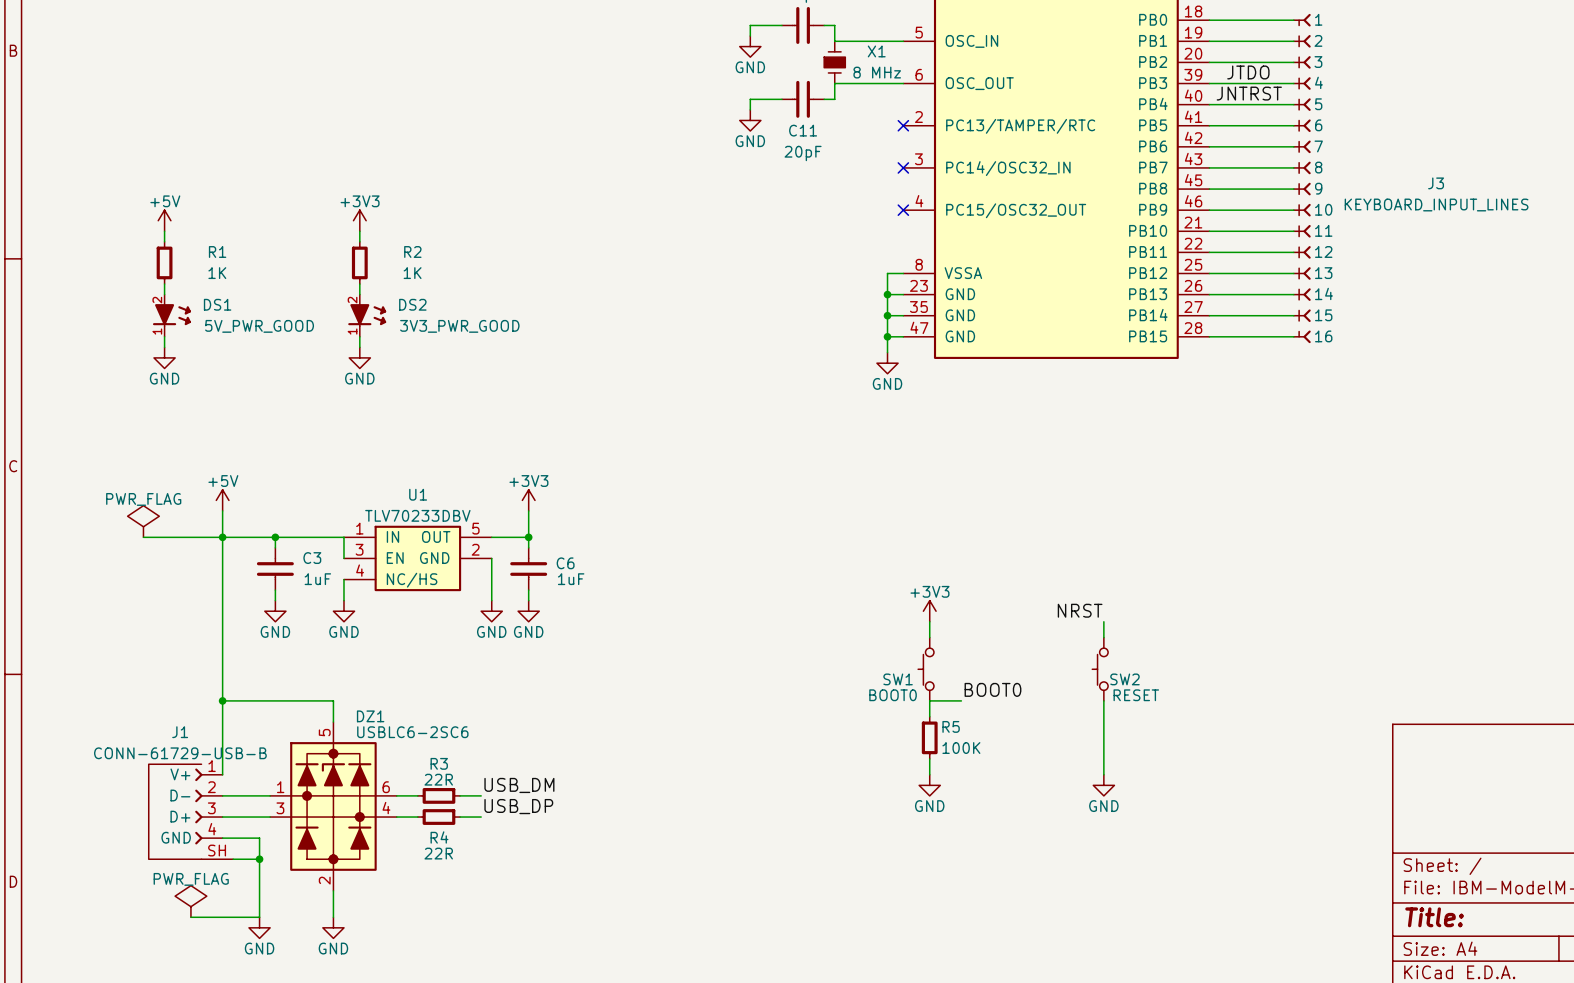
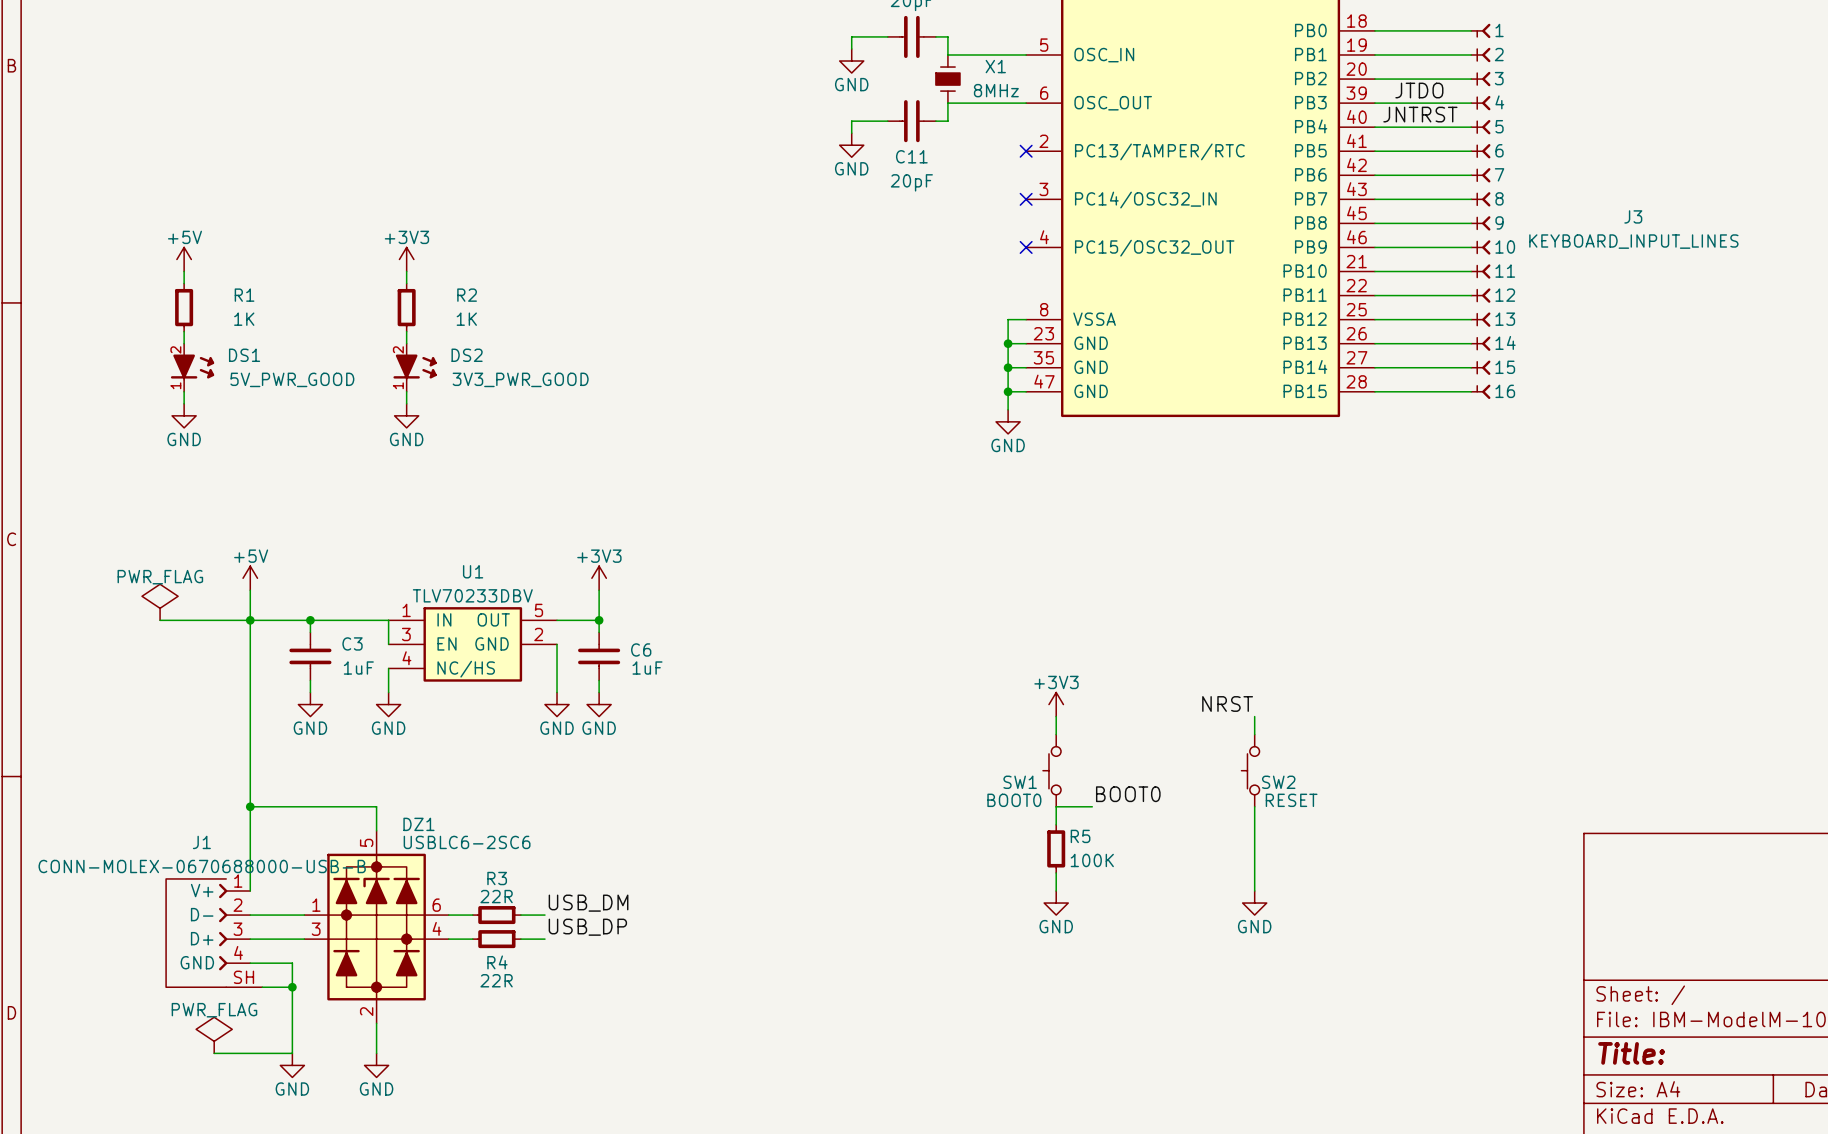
X1 value: 8 MHz (877, 72) -> 8MHz (996, 90)
J1 value: CONN-61729-USB-B (180, 753) -> CONN-MOLEX-0670688000-USB-B (202, 866)

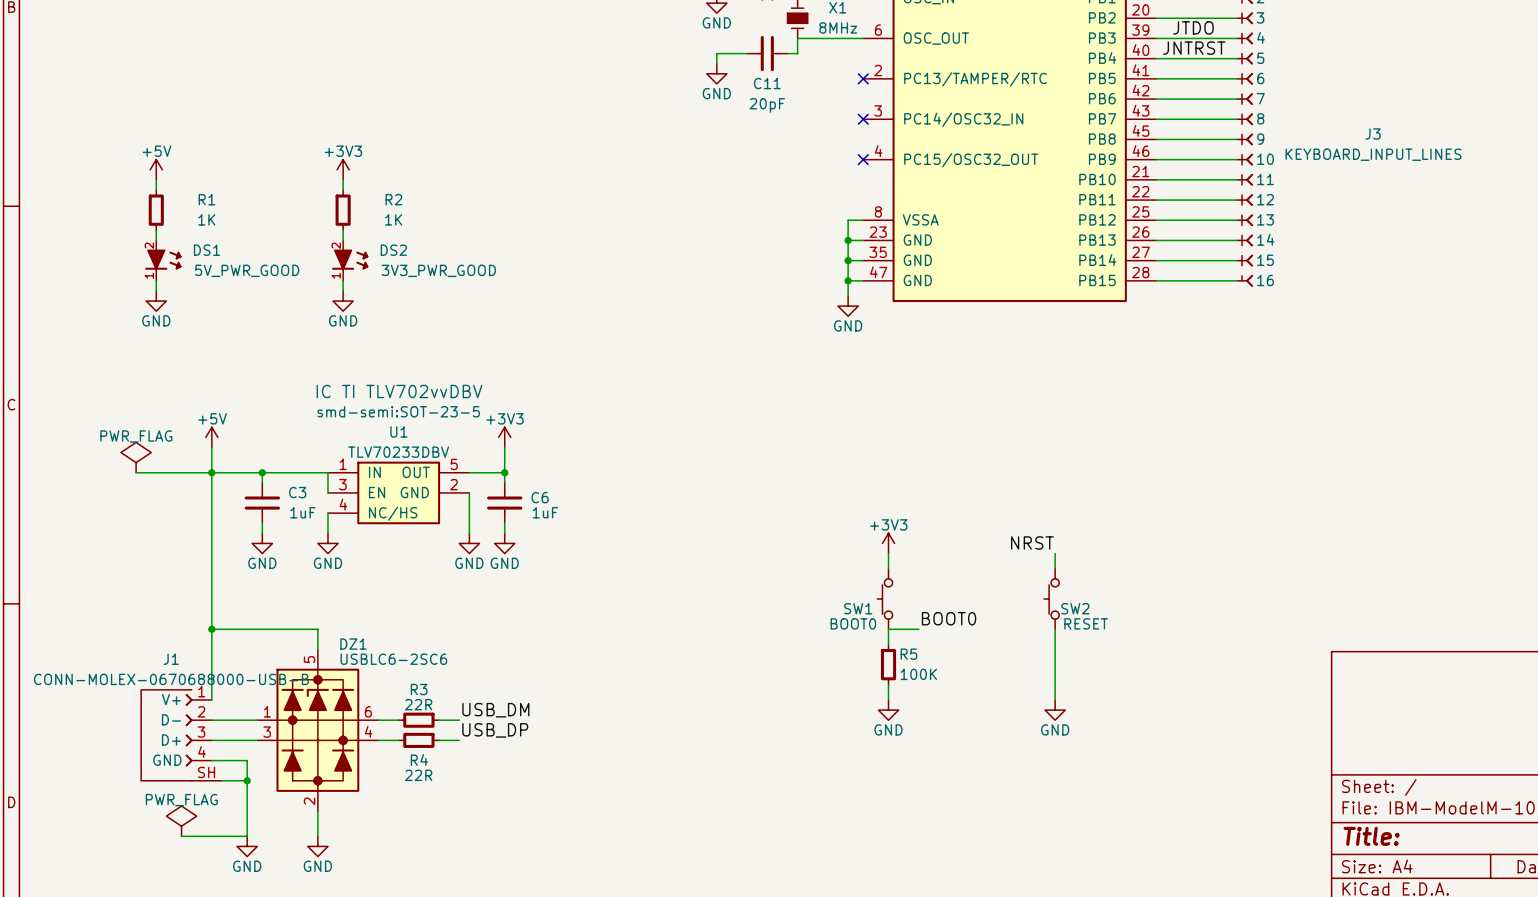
U1 text: none -> IC TI TLV702vvDBV (399, 391)
U1 text: none -> smd-semi:SOT-23-5 (398, 411)

